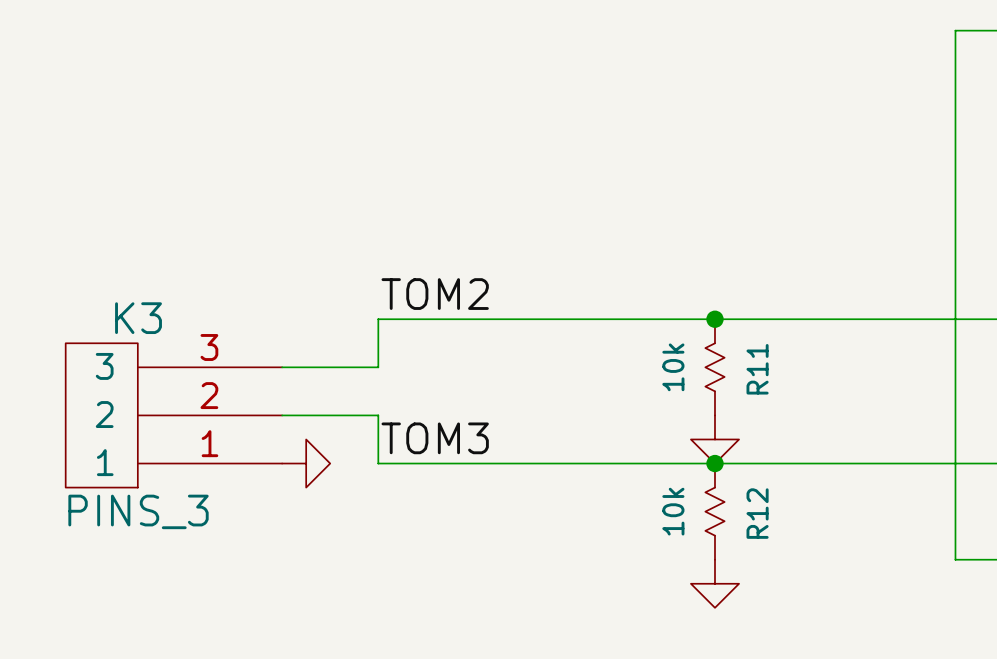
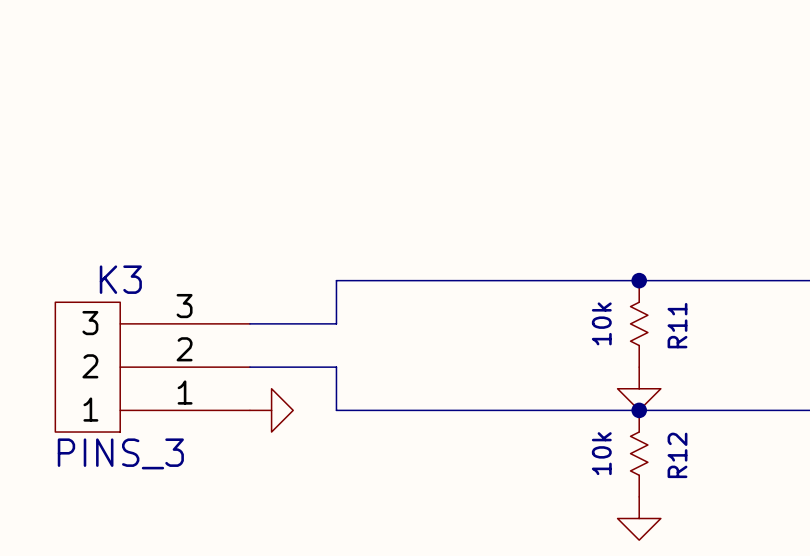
label: TOM2 (435, 294) -> none
label: TOM3 (435, 438) -> none

